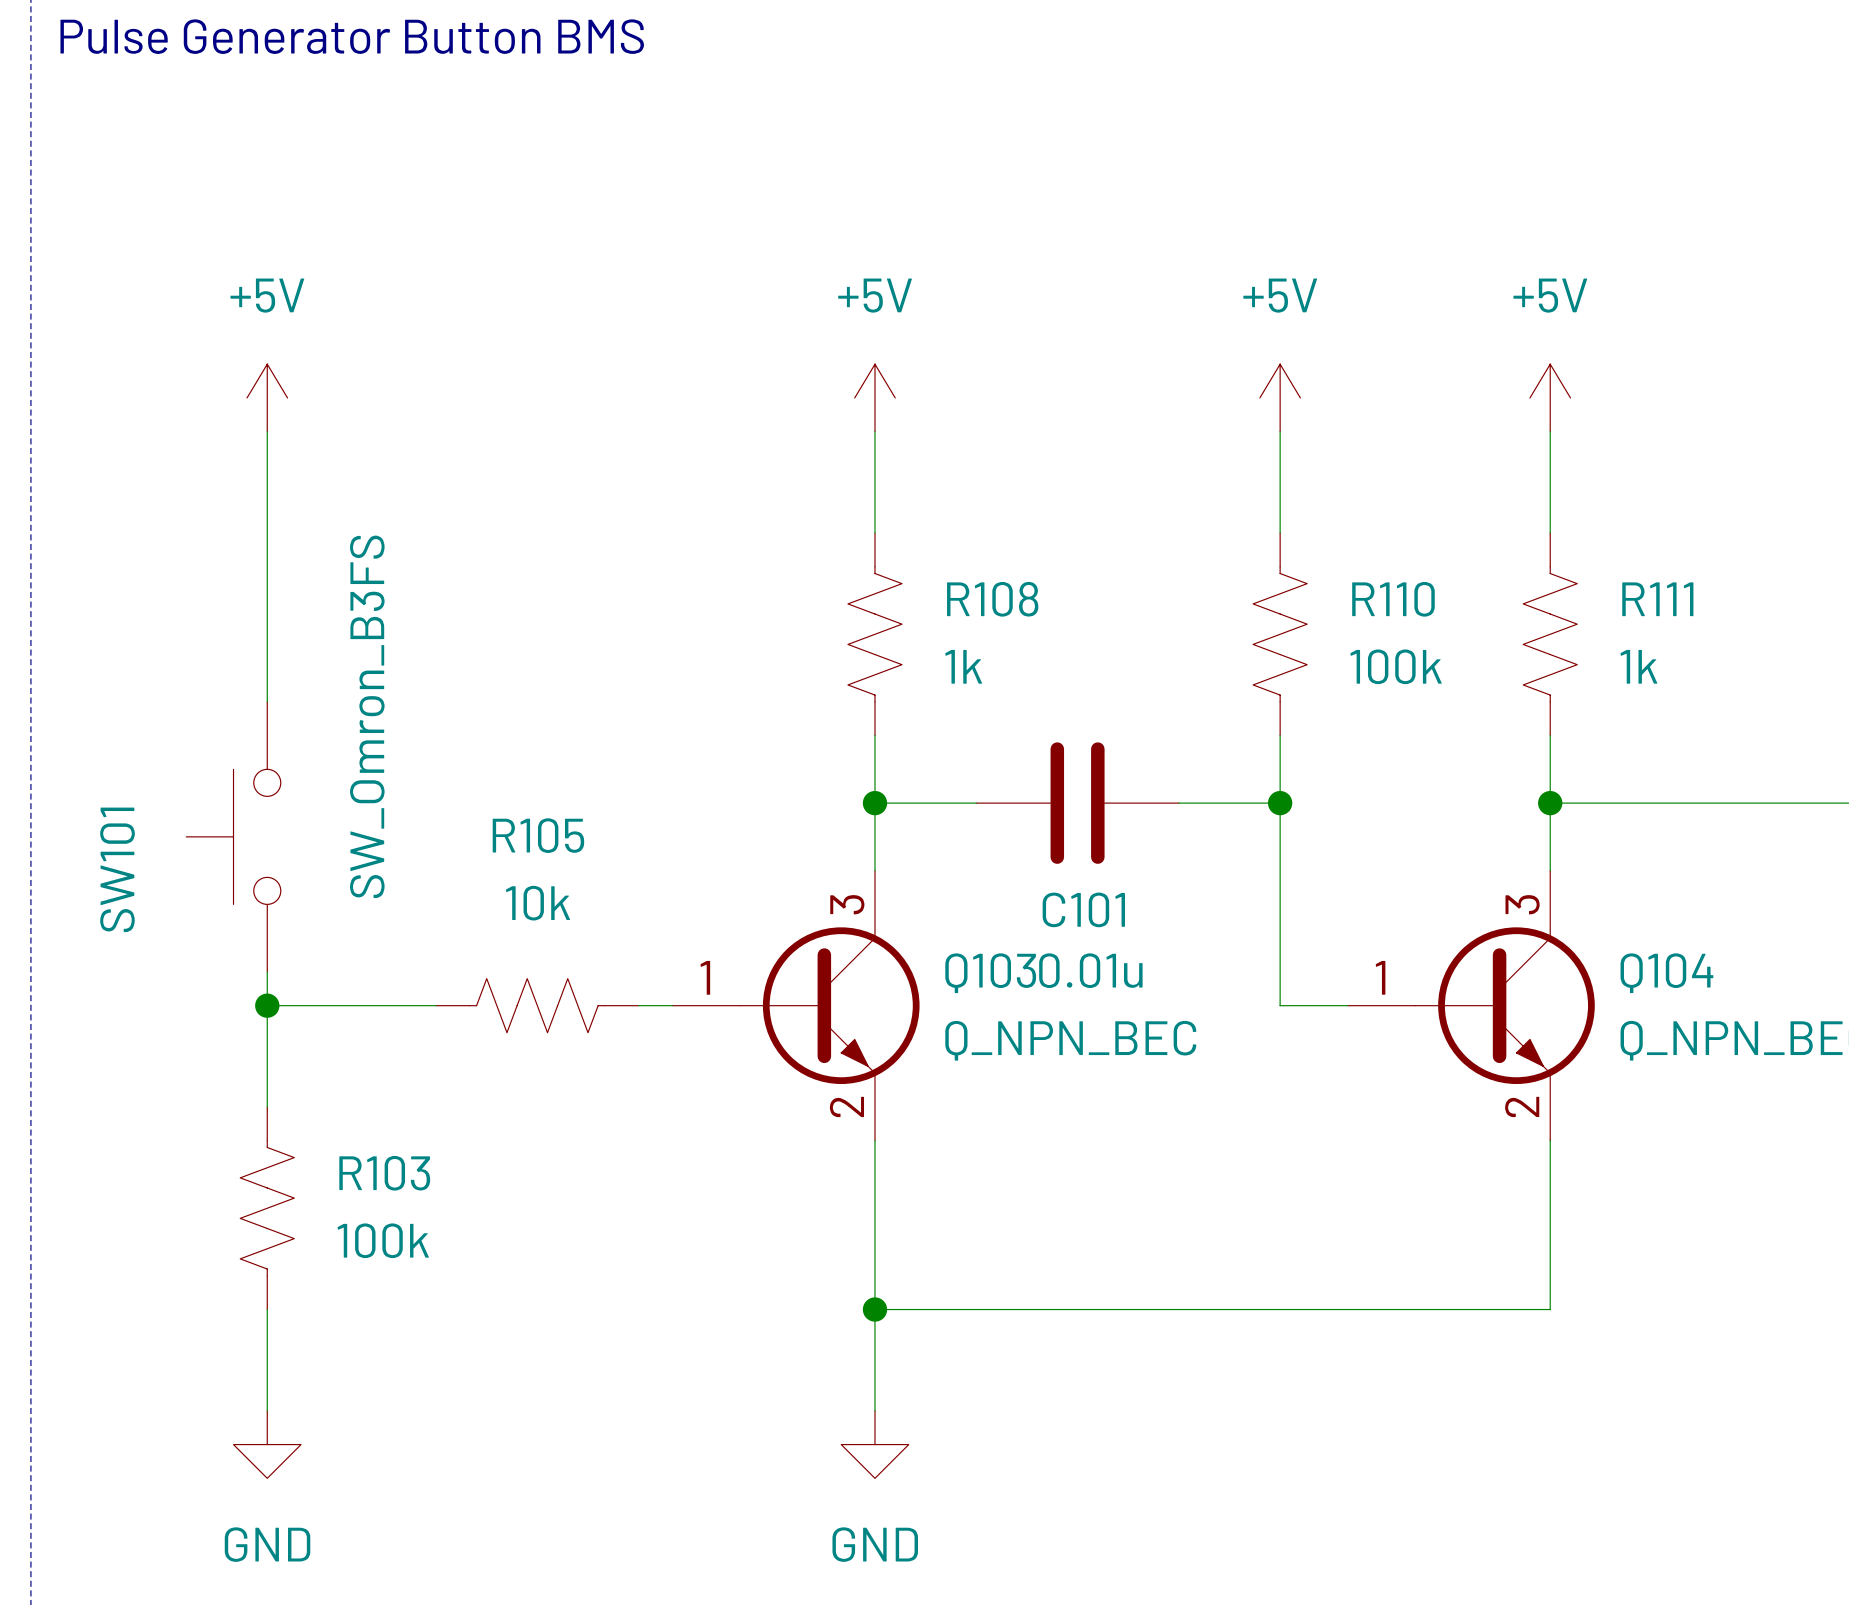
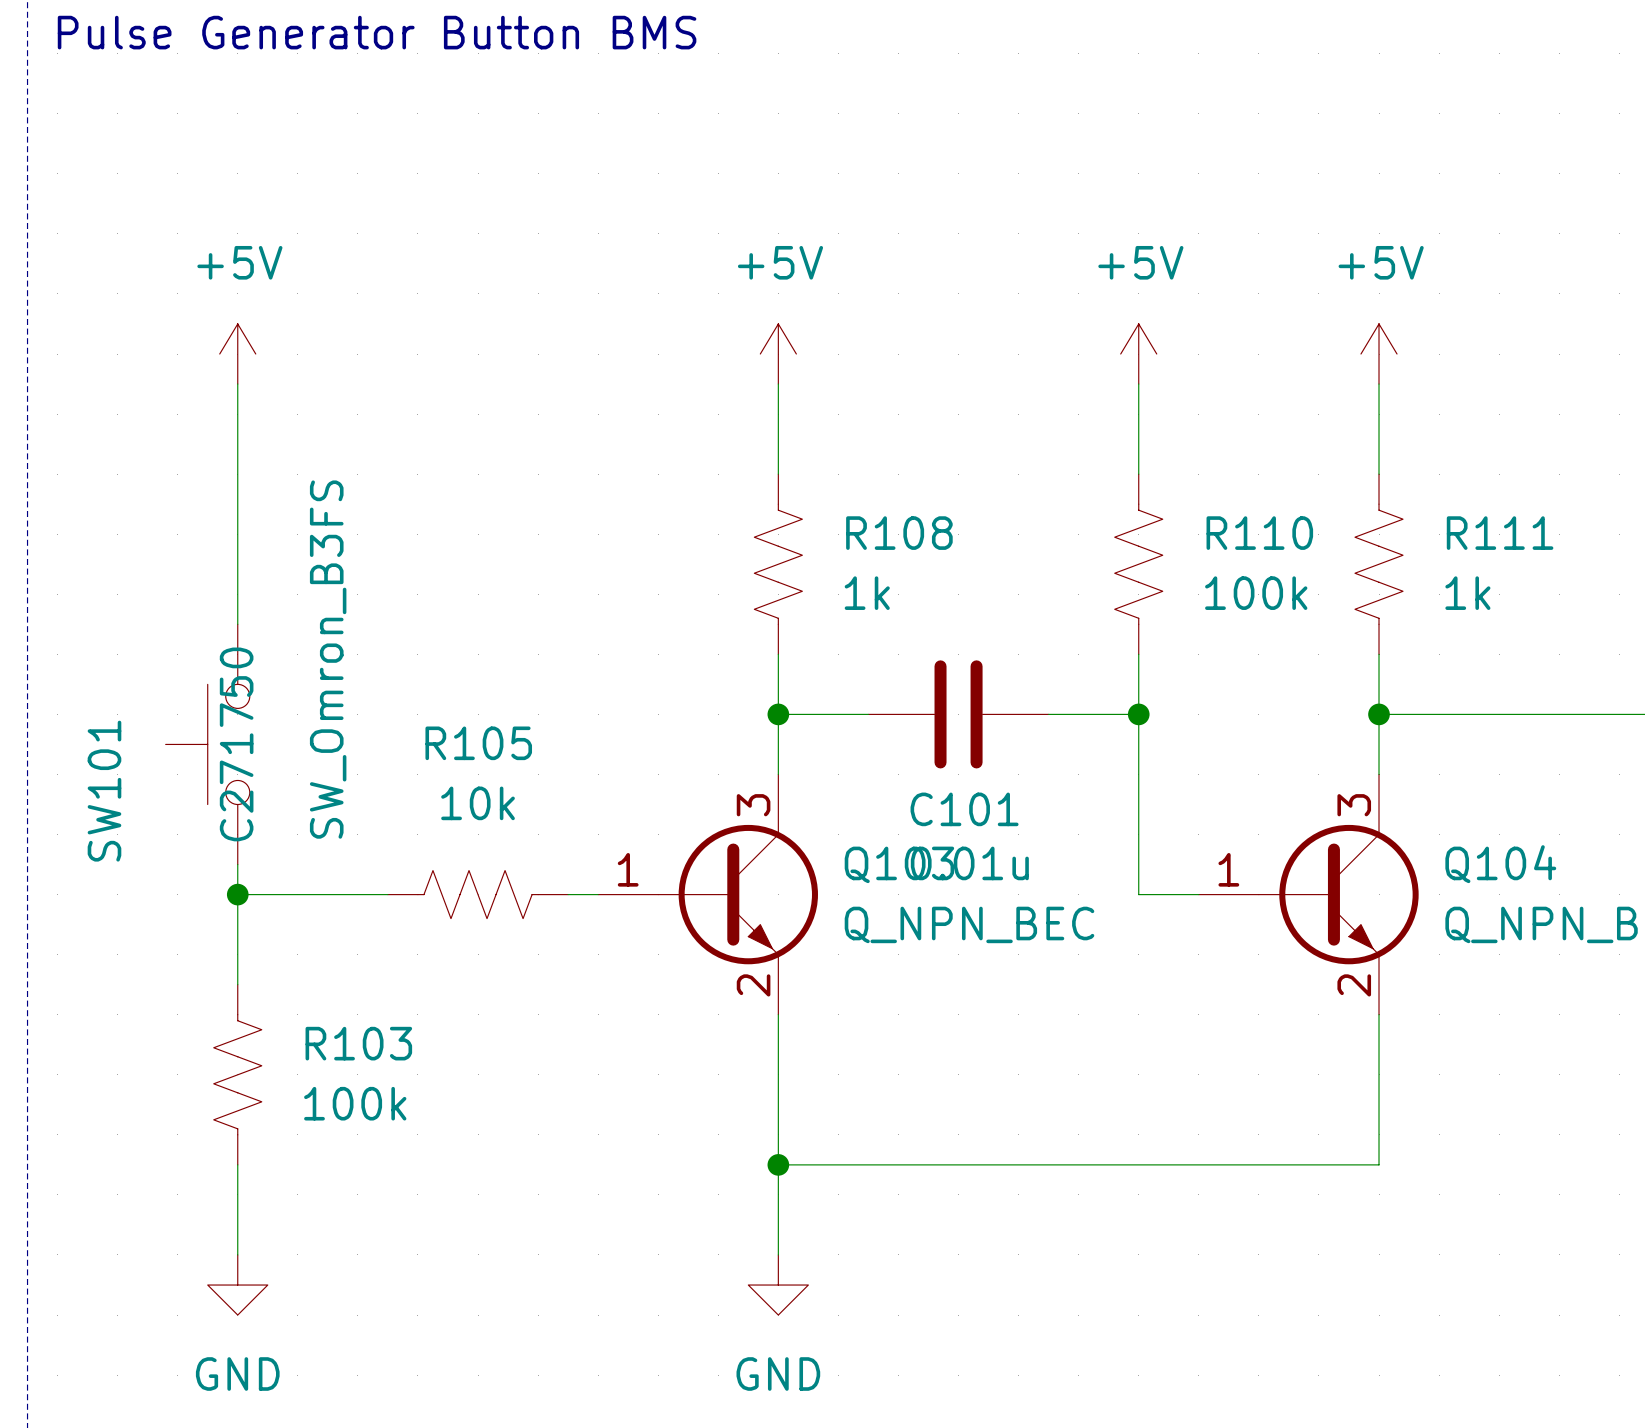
SW101 text: none -> C271750 (236, 744)

